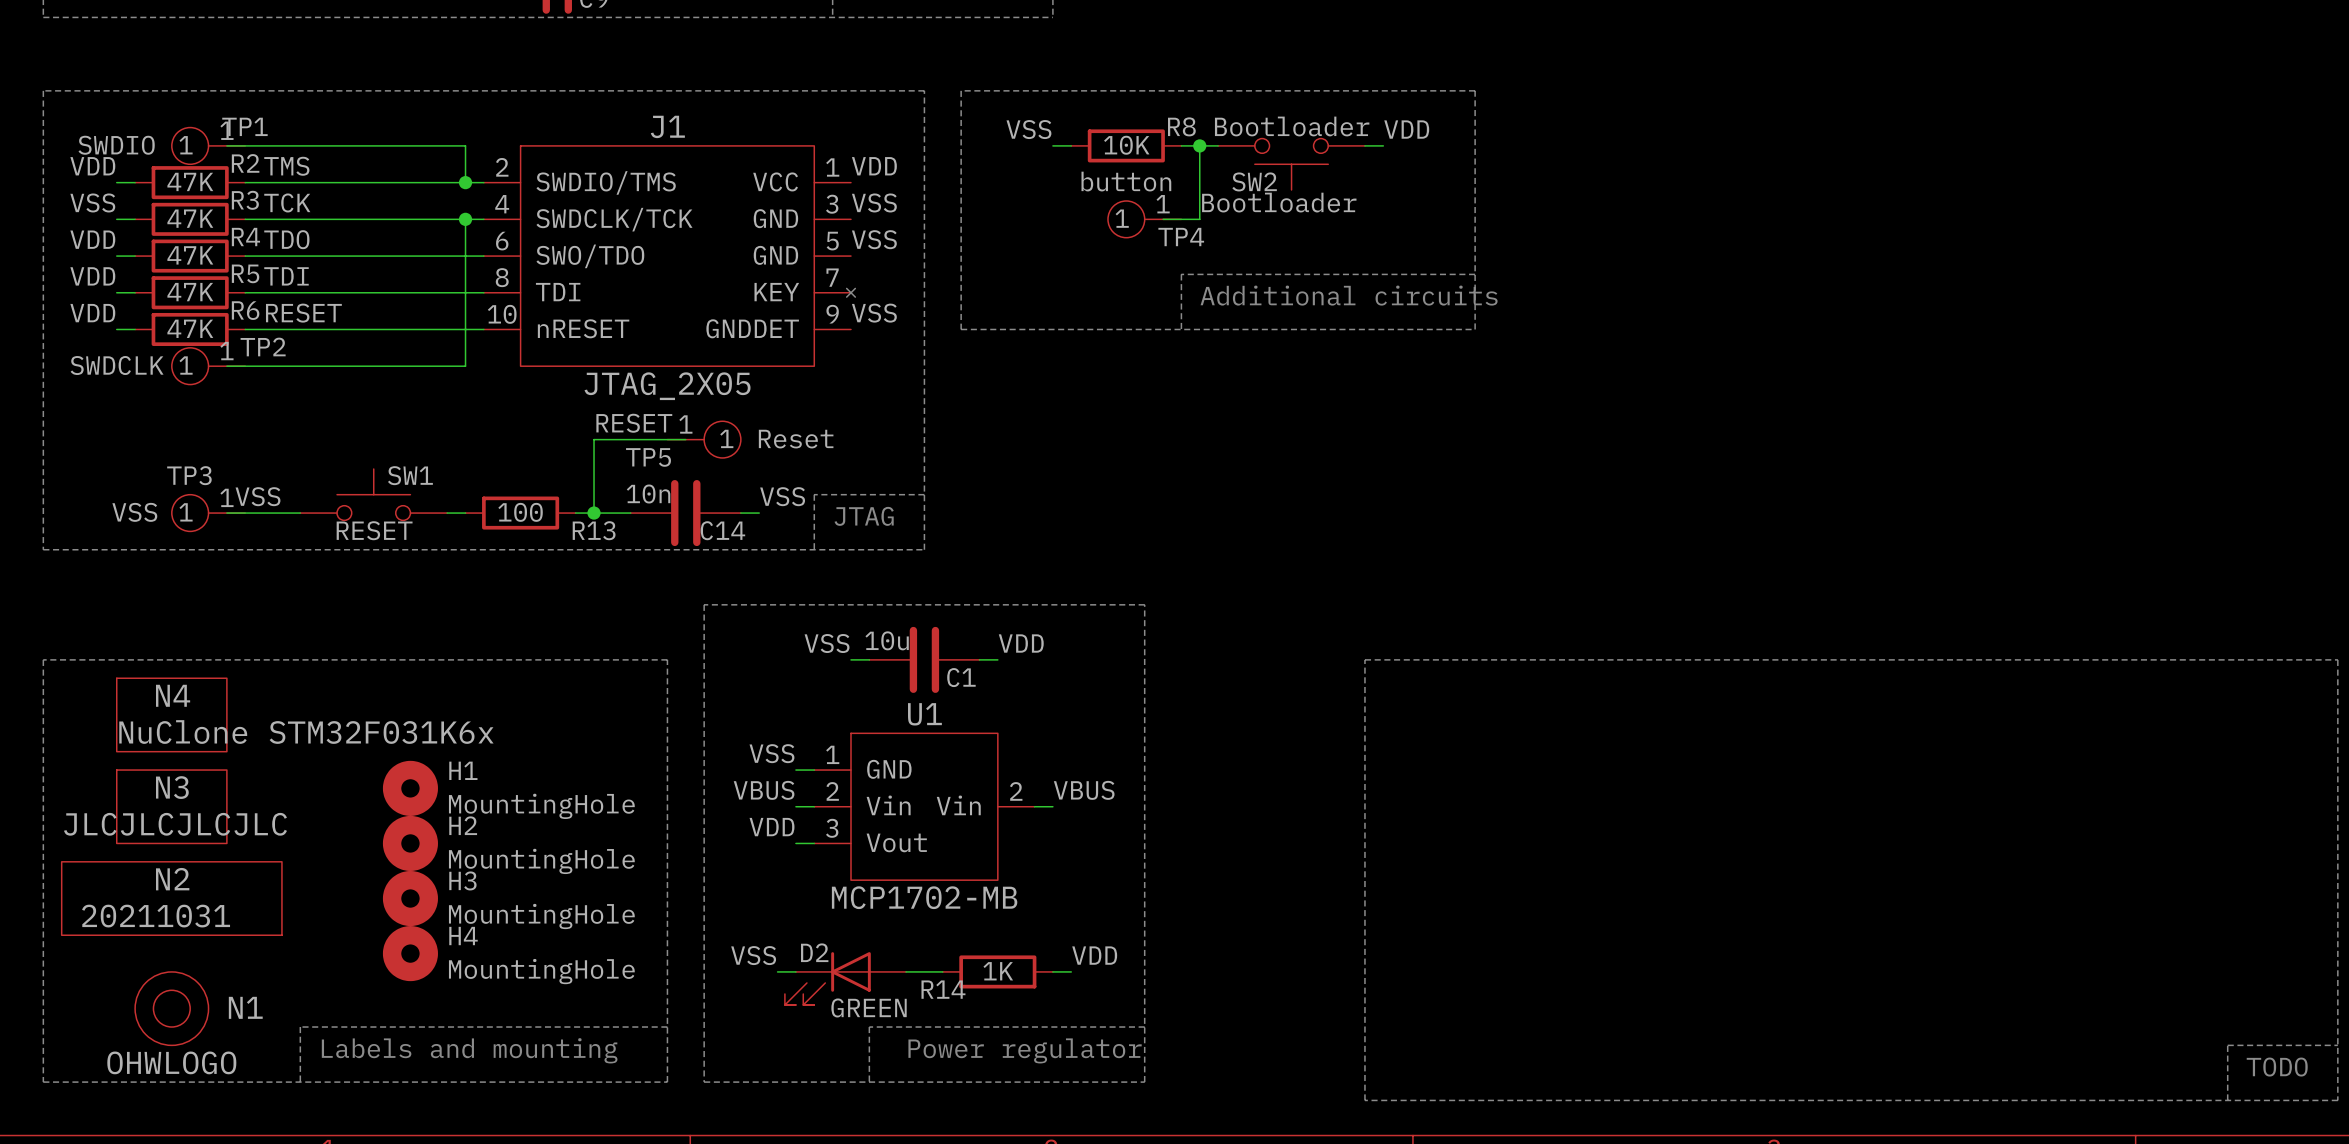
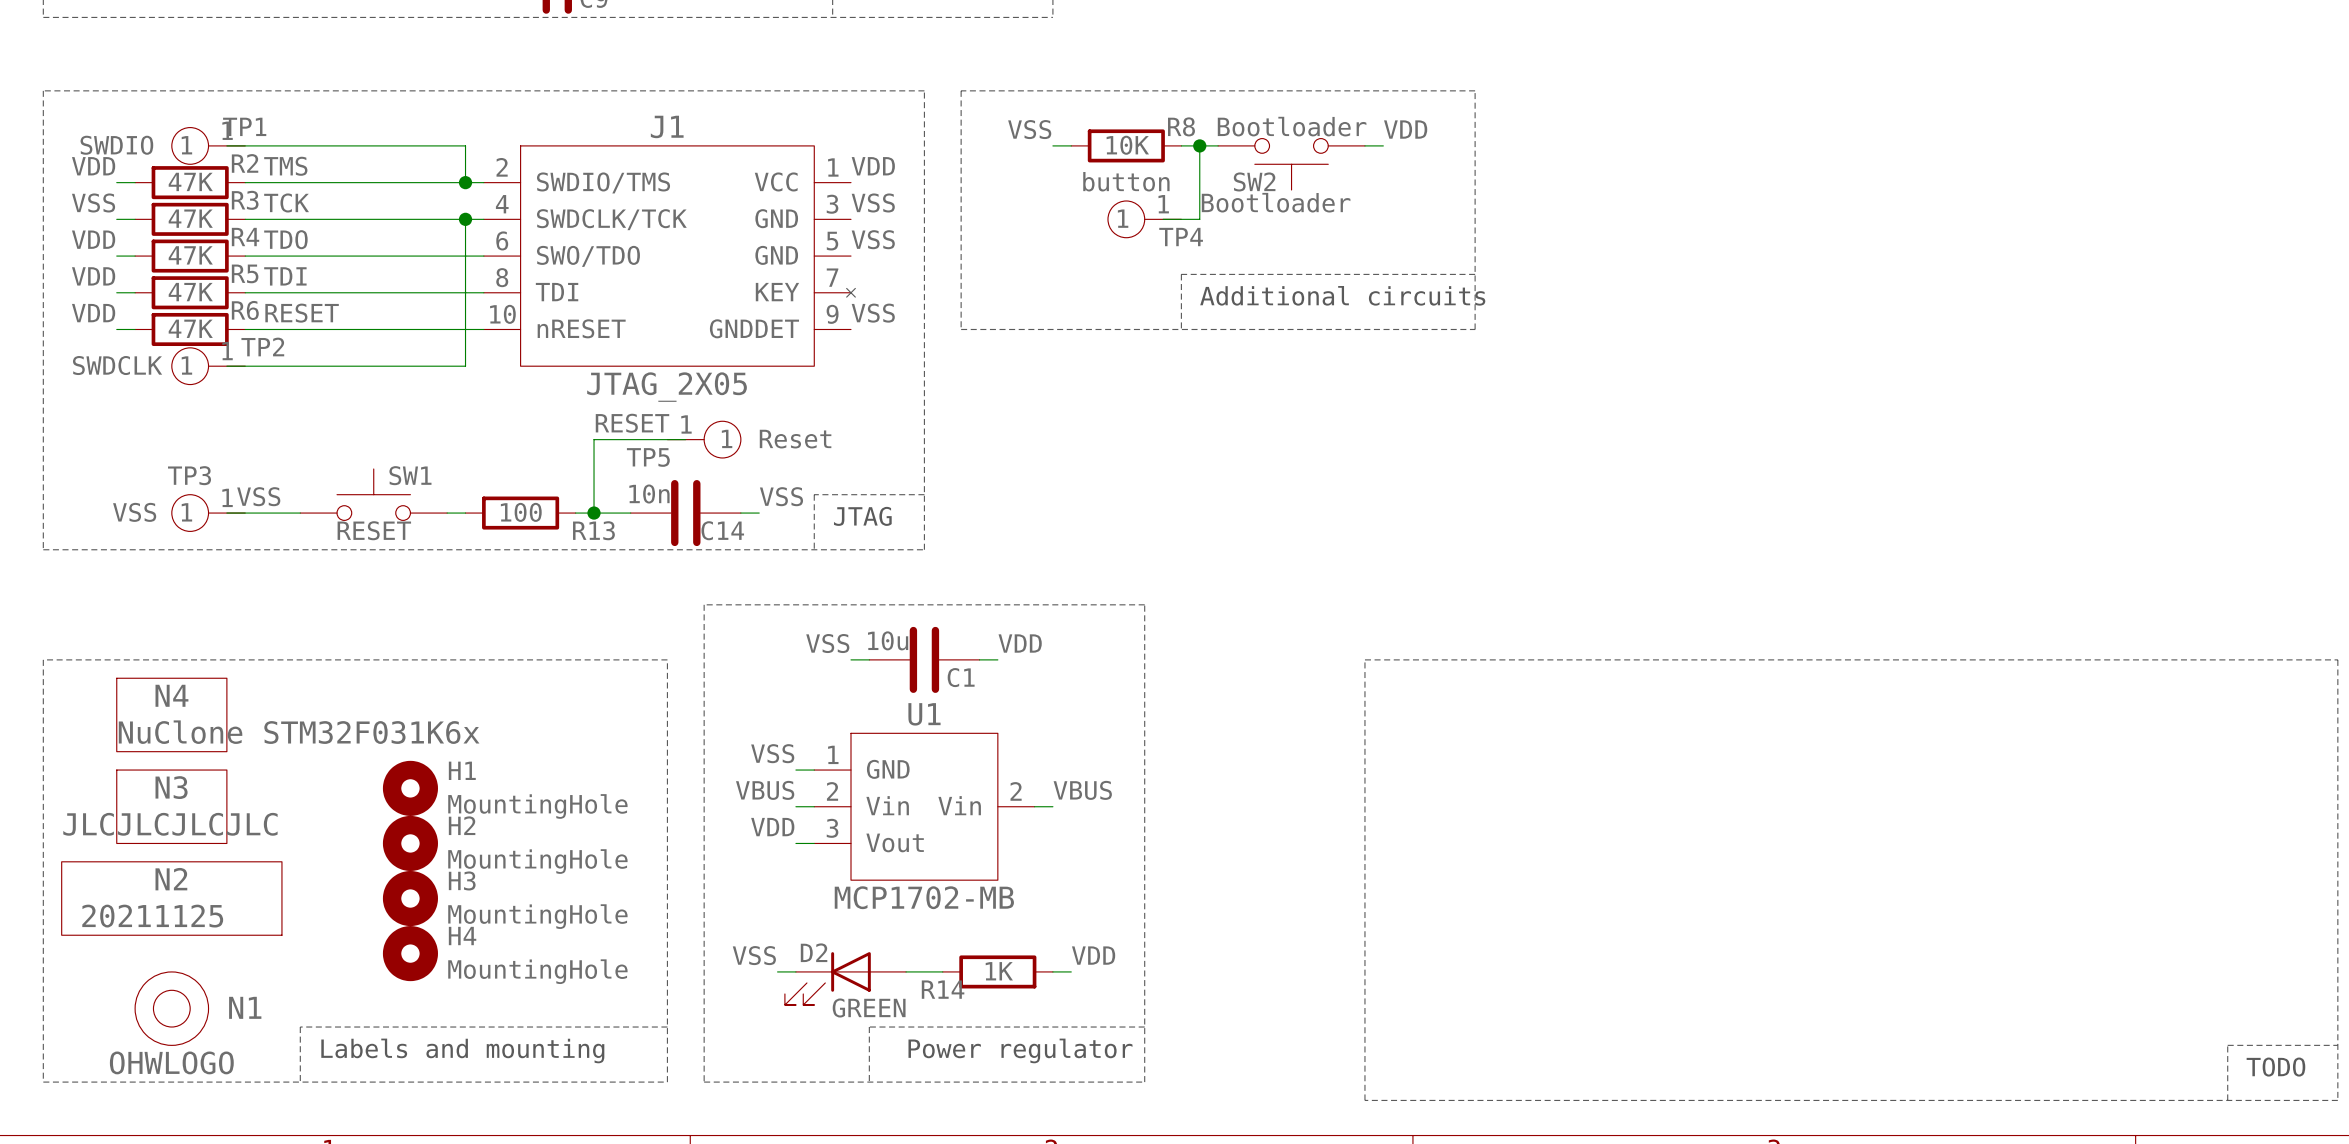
N2 value: 20211031 (156, 916) -> 20211125 (152, 916)

